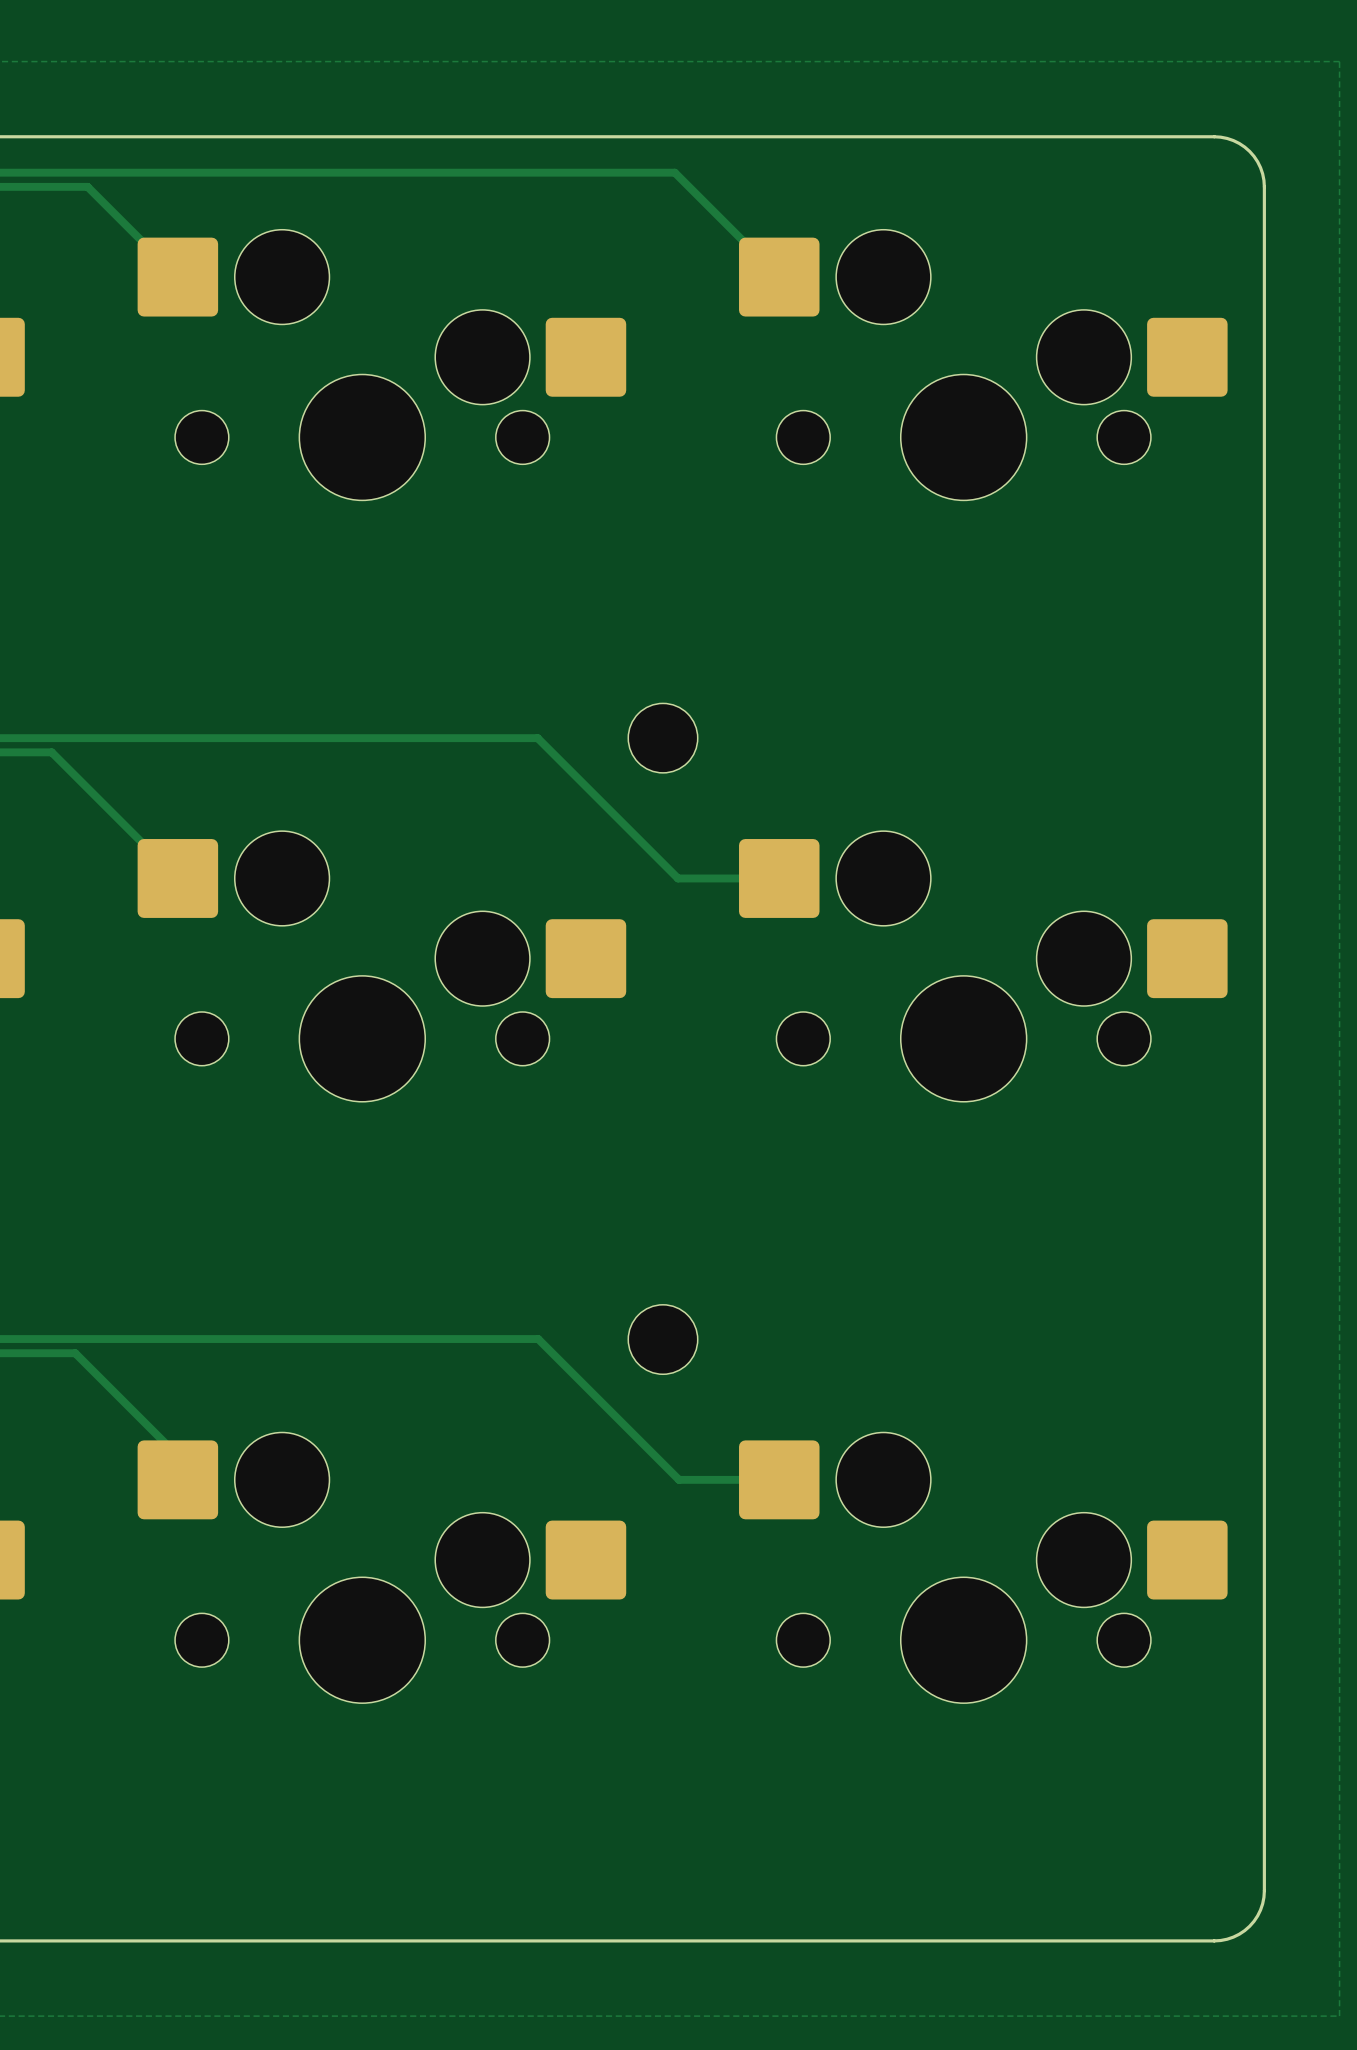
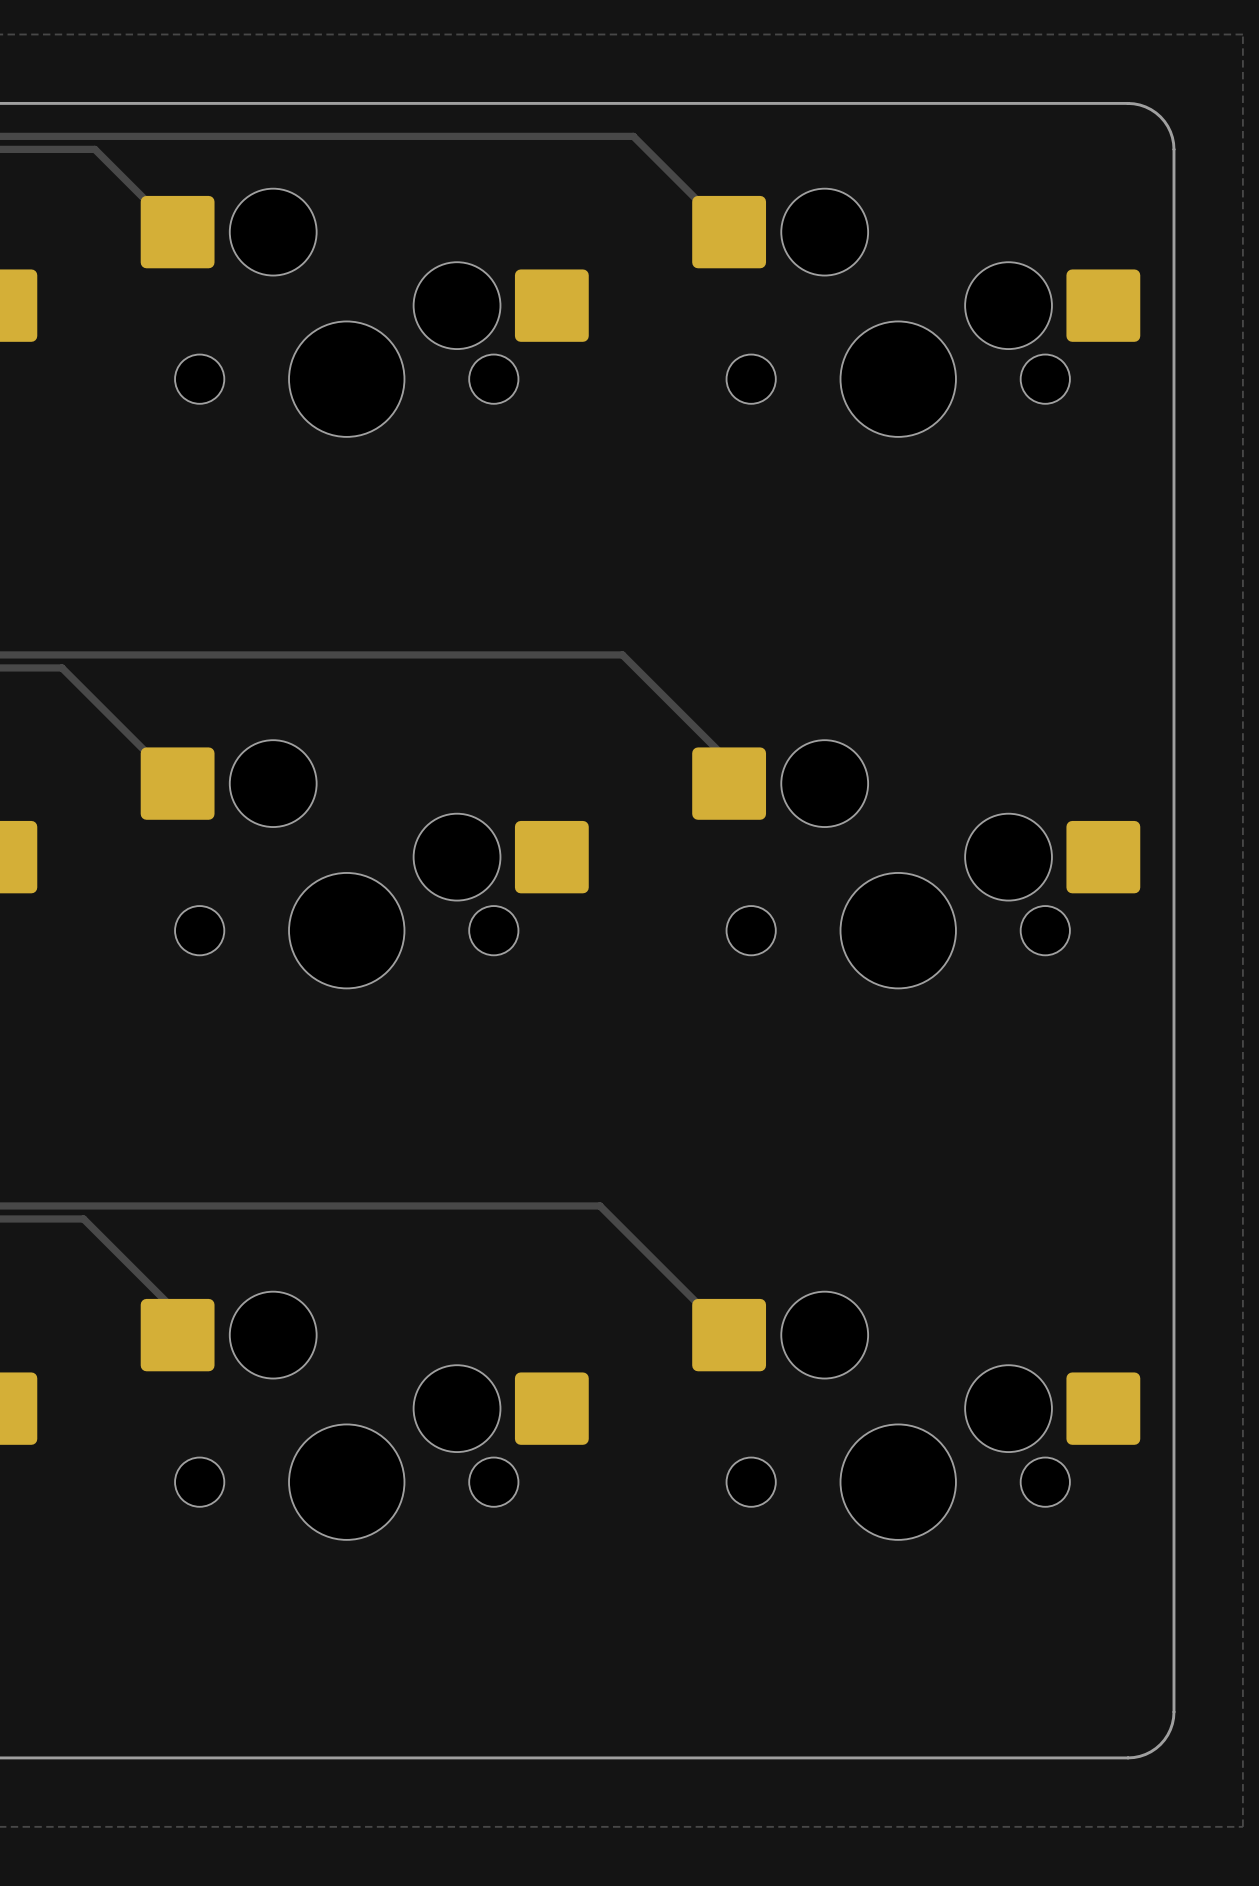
track: (537, 738) (678, 878) (779, 878) -> (507, 654) (622, 654) (729, 761) (729, 783)
part: (662, 738) -> none
track: (538, 1339) (679, 1479) (779, 1479) -> (508, 1205) (599, 1205) (729, 1335)
part: (662, 1339) -> none

